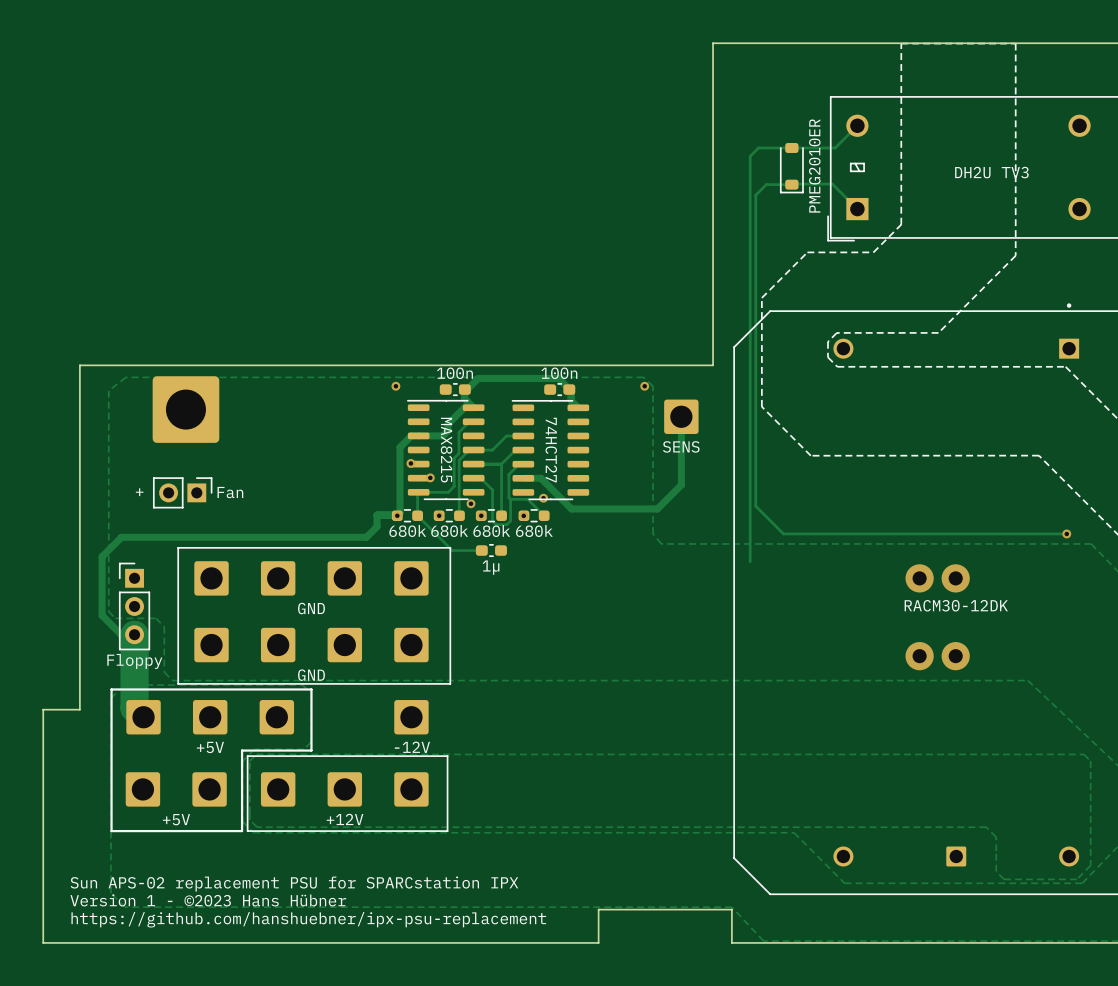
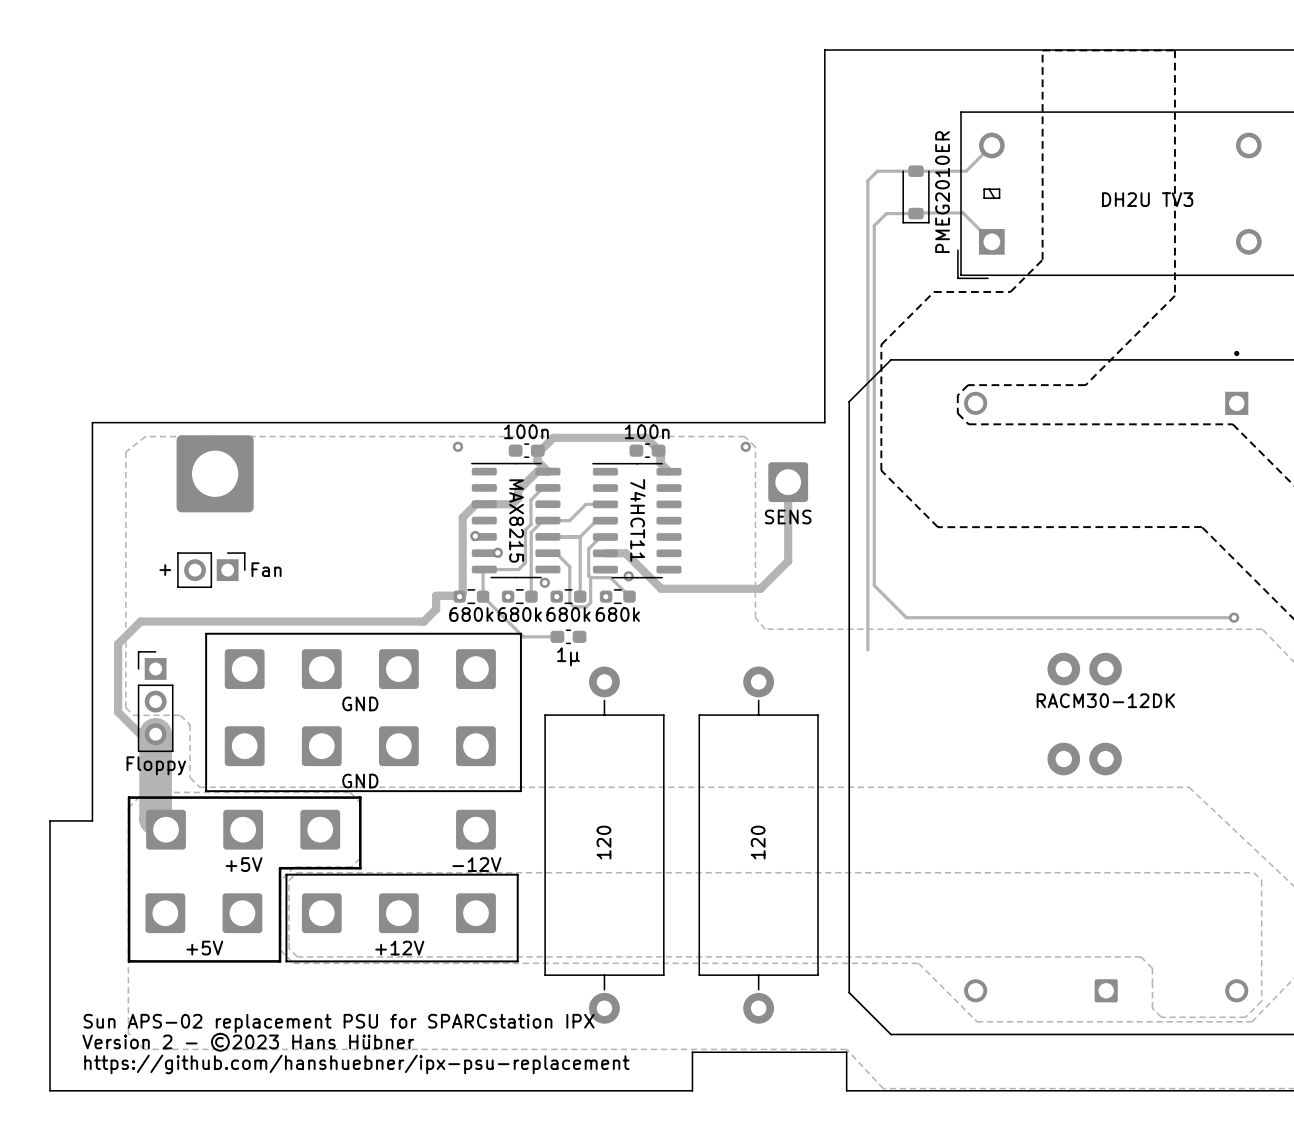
part value: 74HCT27 (551, 450) -> 74HCT11 (638, 520)
part: none -> 120 (604, 845)
part: none -> 120 (758, 845)
text: Version 1 - ©2023 Hans Hübner (208, 900) -> Version 2 - ©2023 Hans Hübner (248, 1042)

